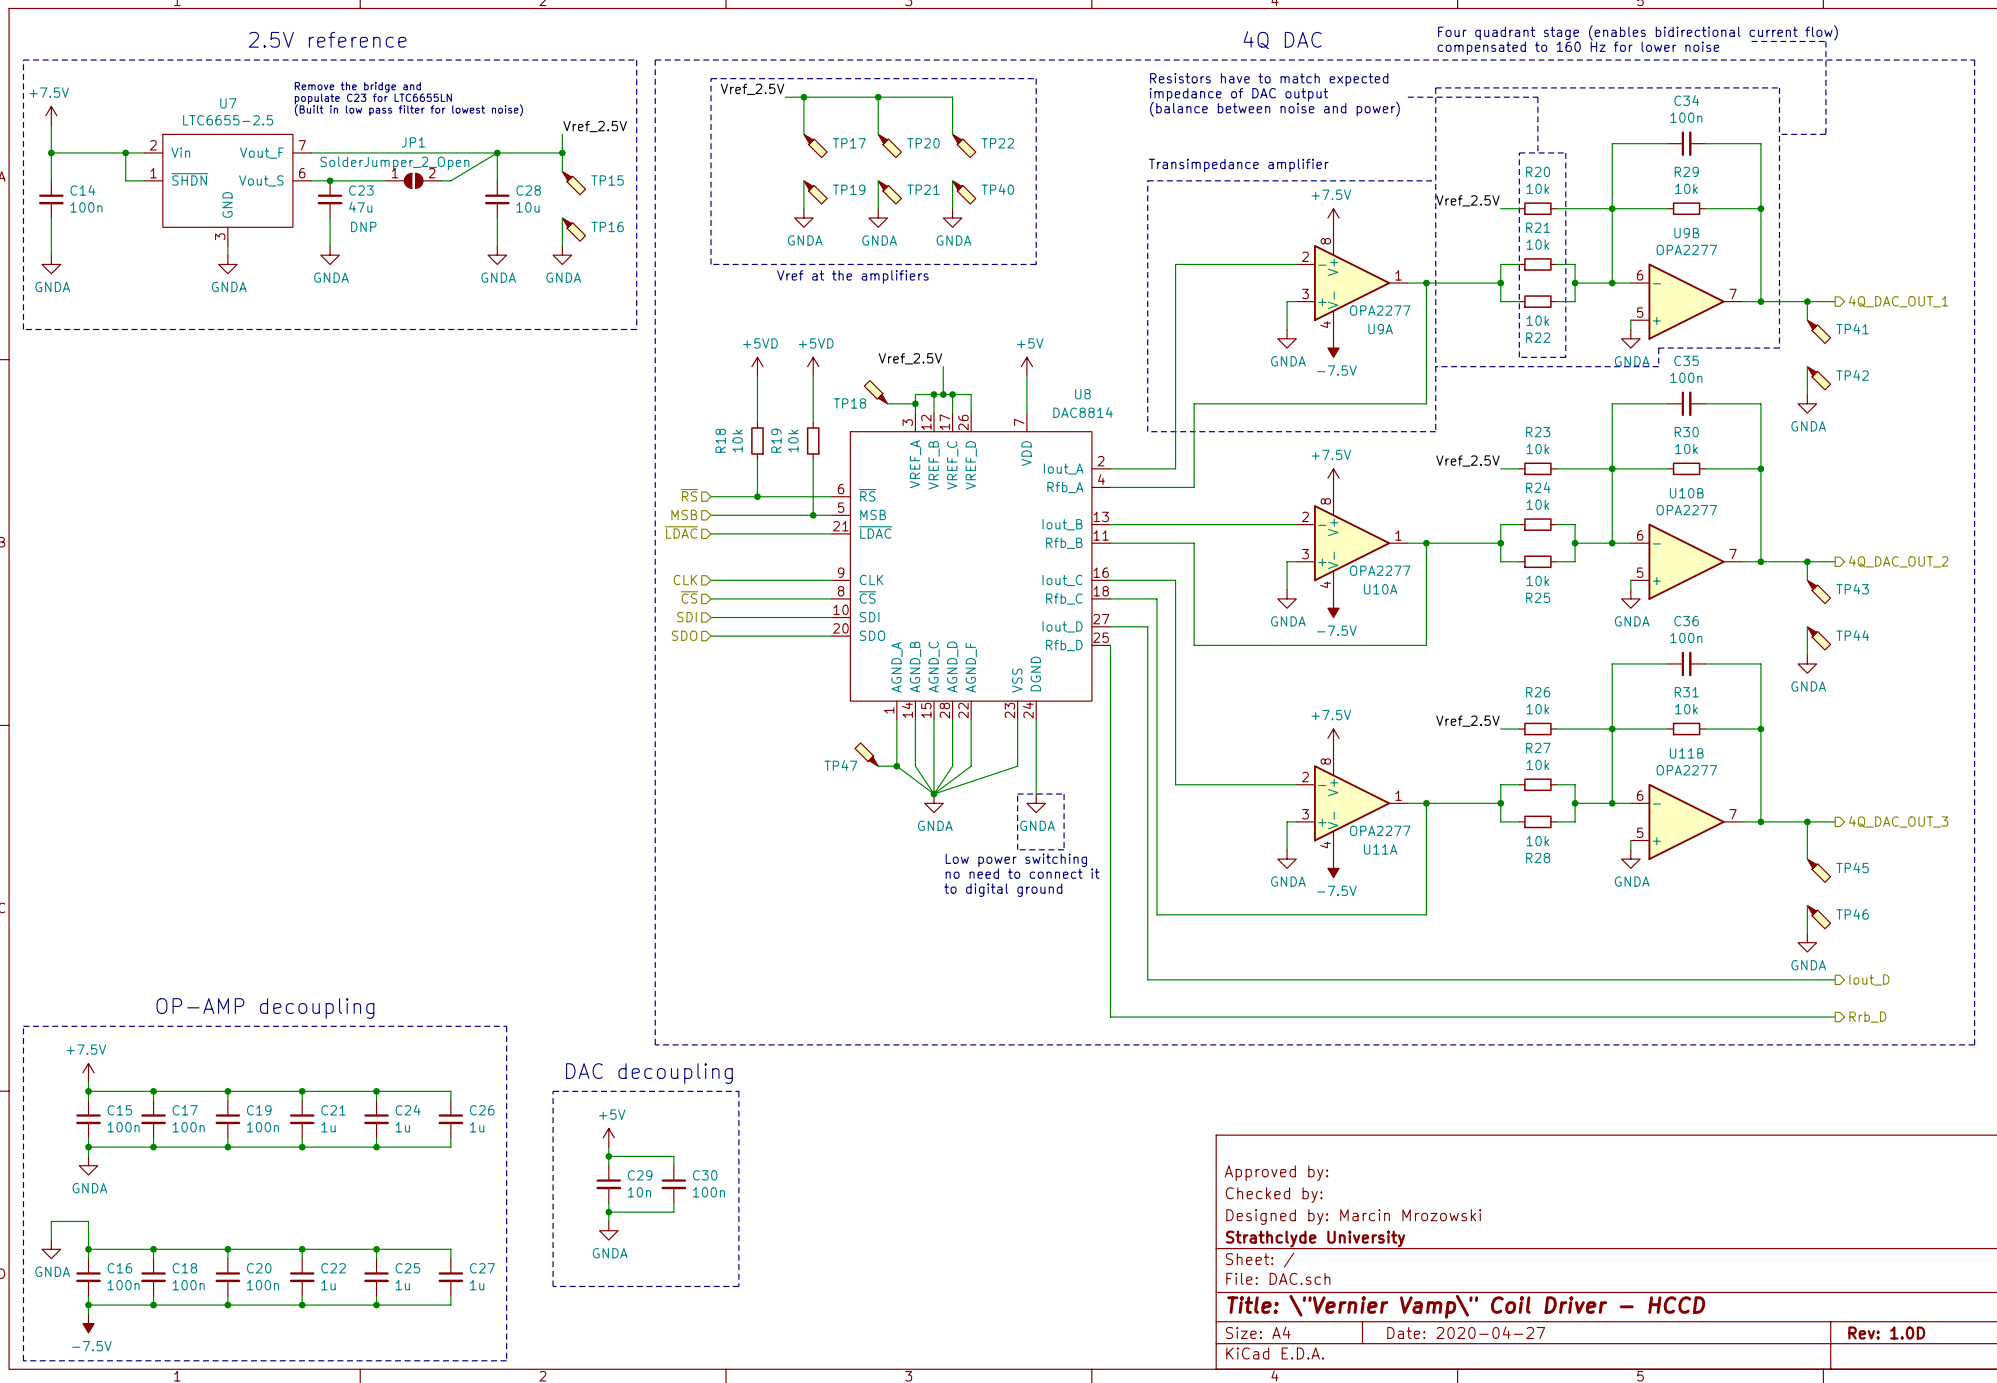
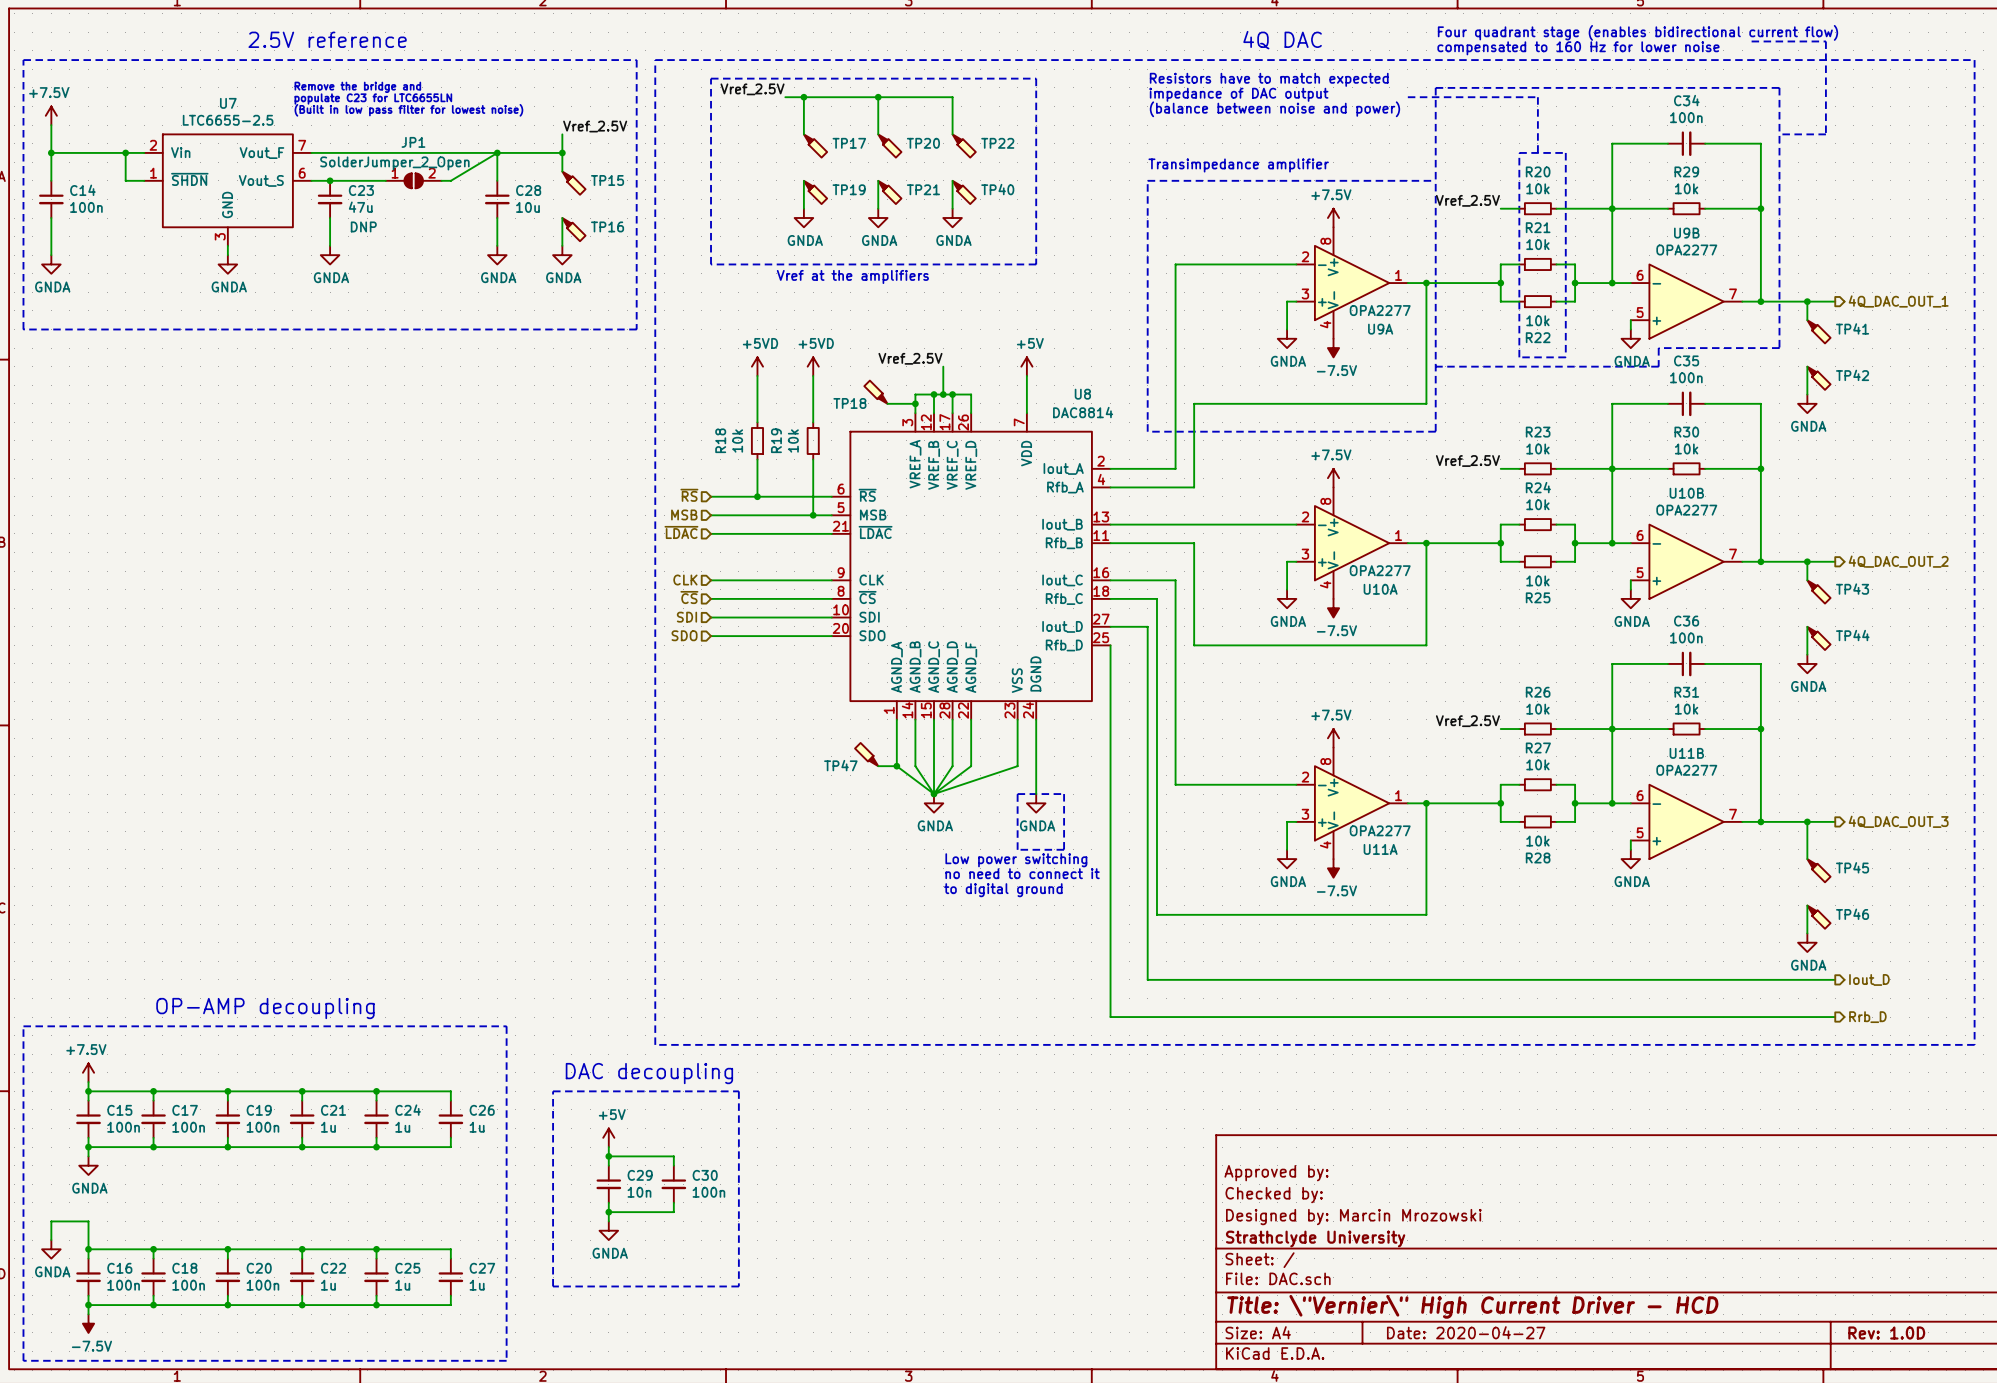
title block: Title: \"Vernier Vamp\" Coil Driver - HCCD (1466, 1306) -> Title: \"Vernier\" High Current Driver - HCD (1472, 1306)

